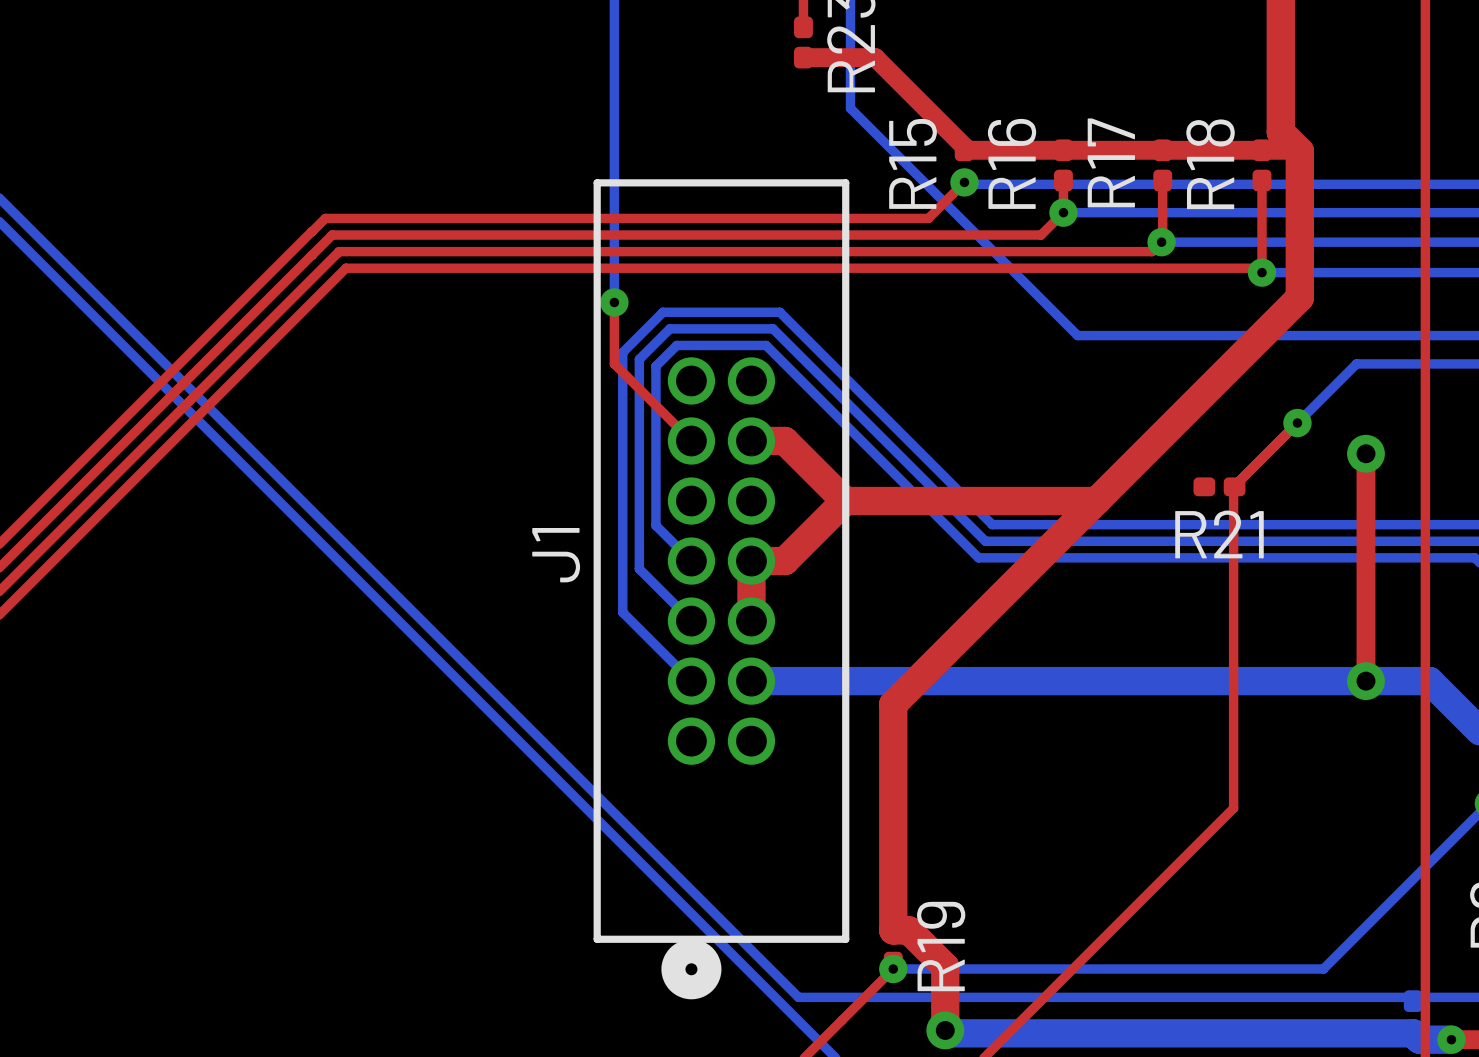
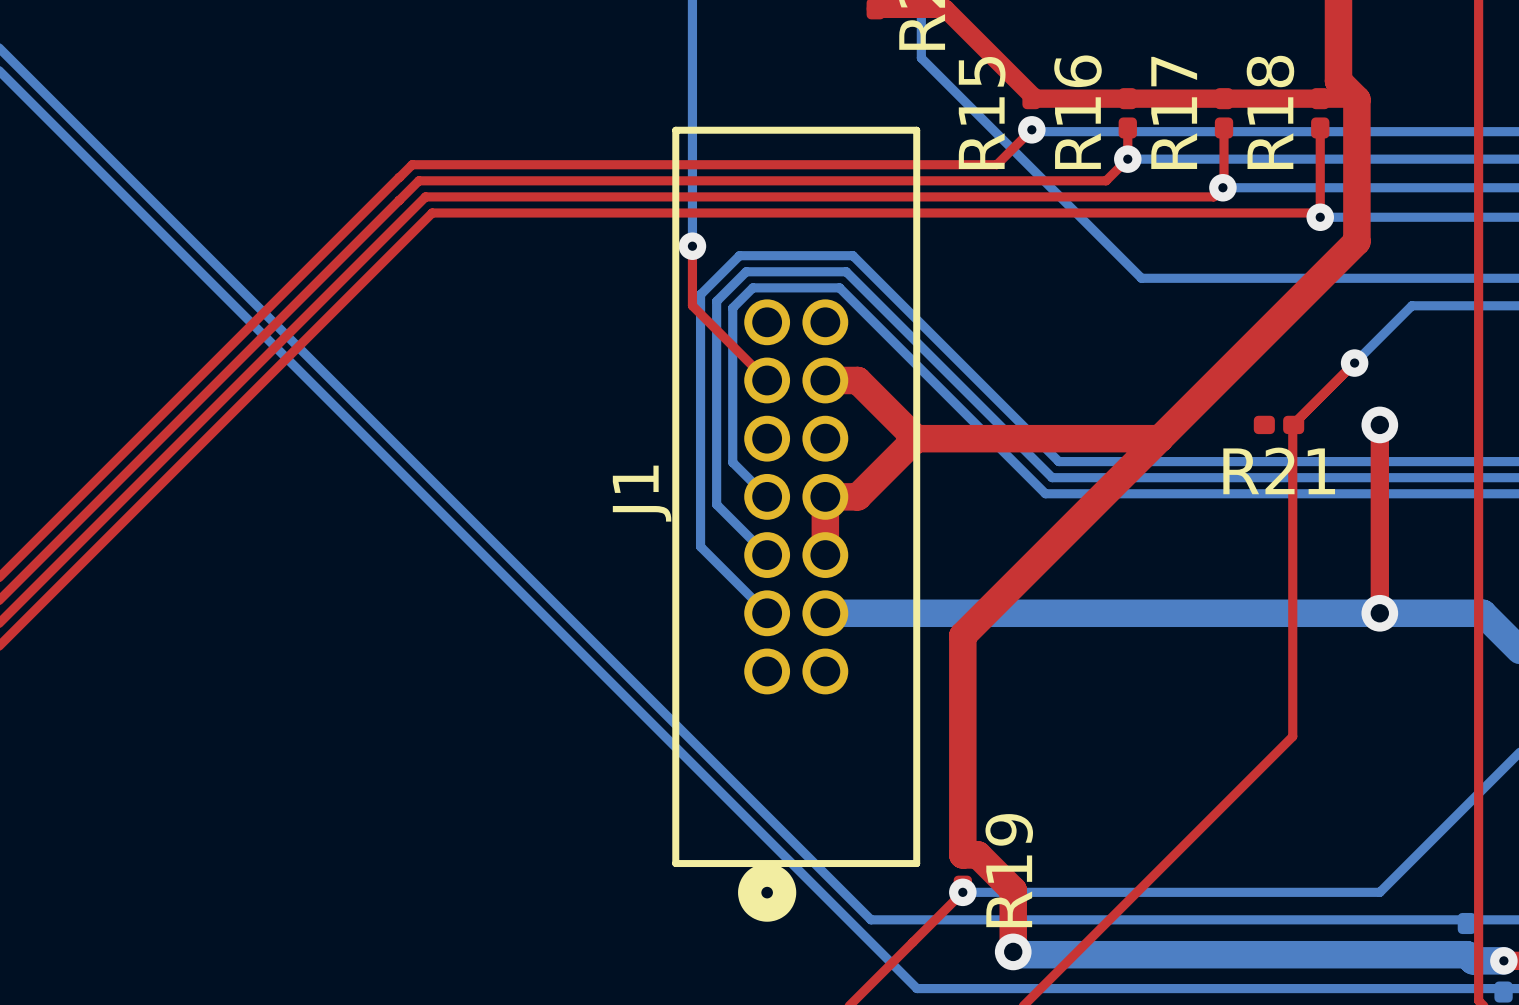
top track: (1365, 453) (1365, 681) -> none
via position: (1365, 453) -> (1379, 424)
top track: none -> (1379, 424) (1379, 613)
via position: (1365, 681) -> (1379, 613)

